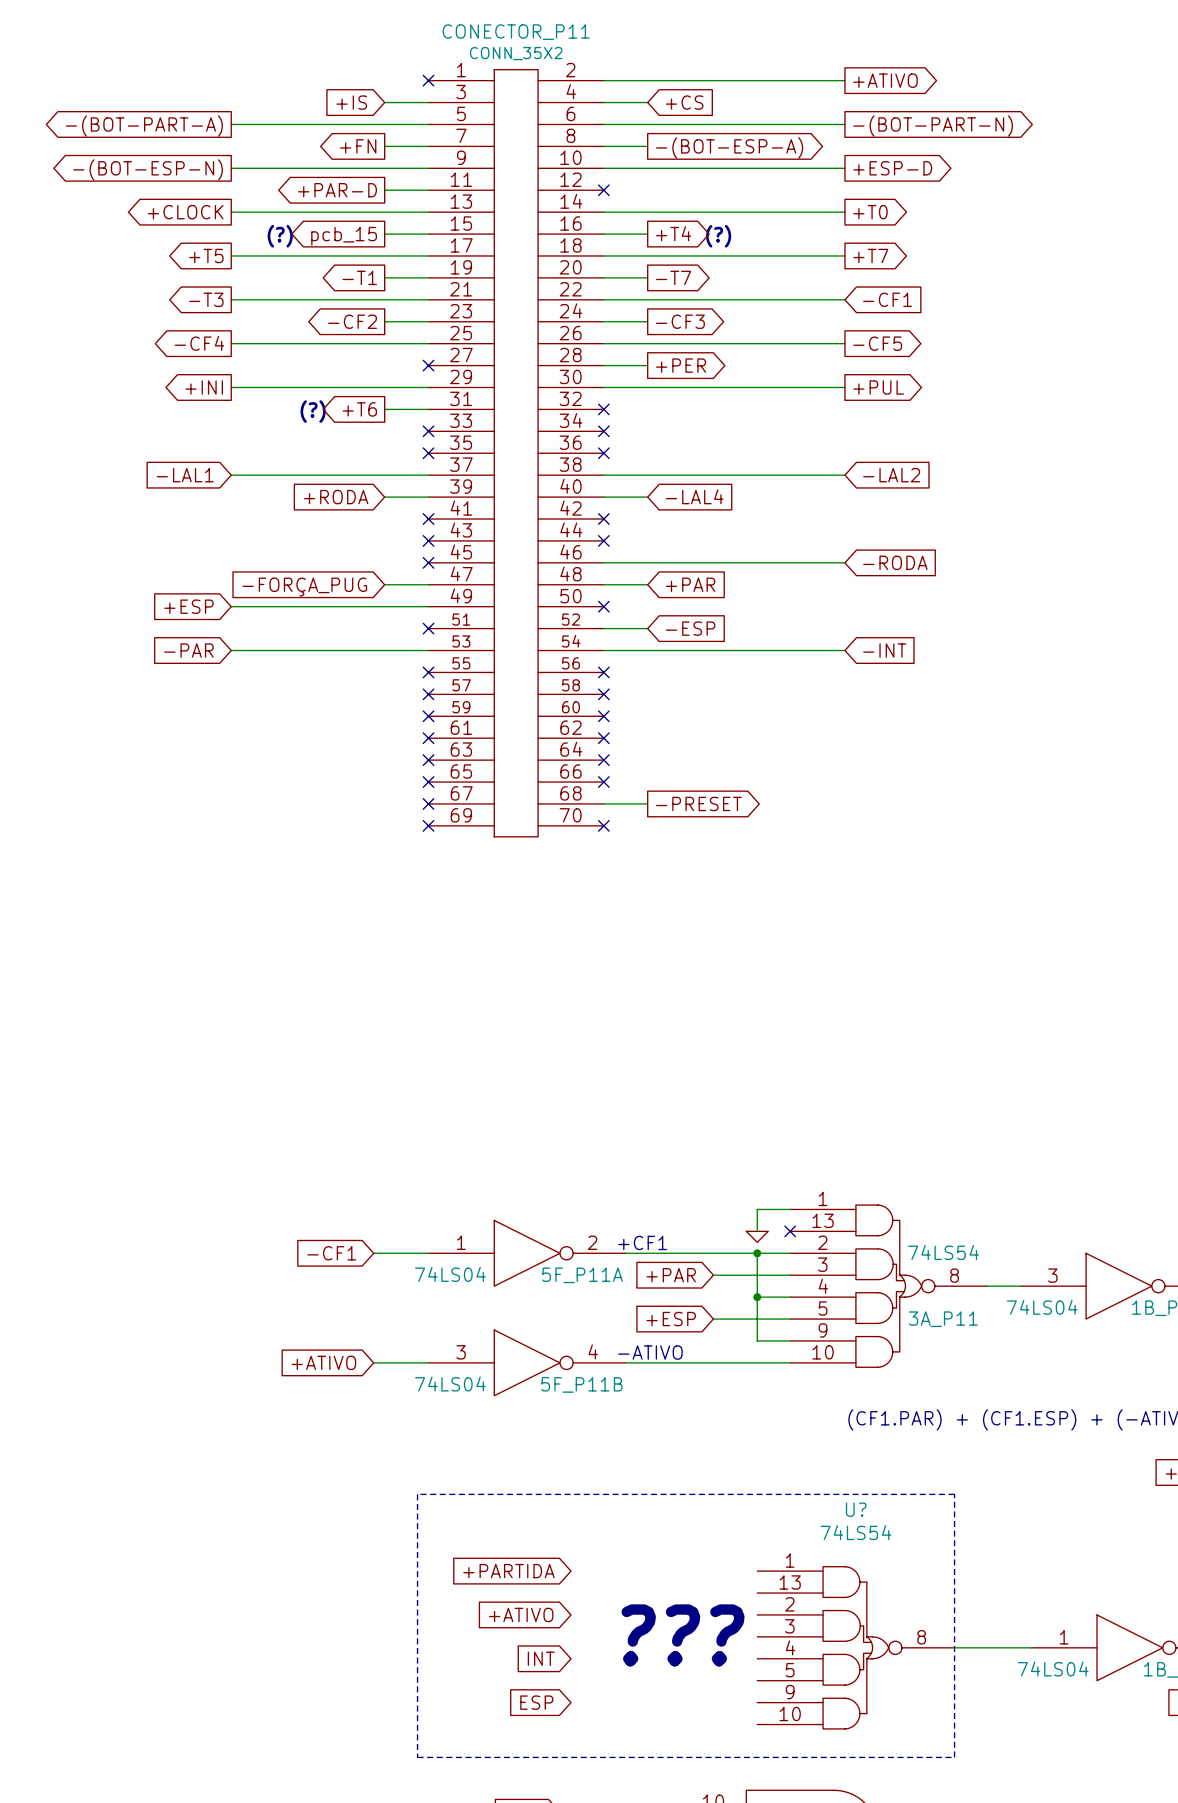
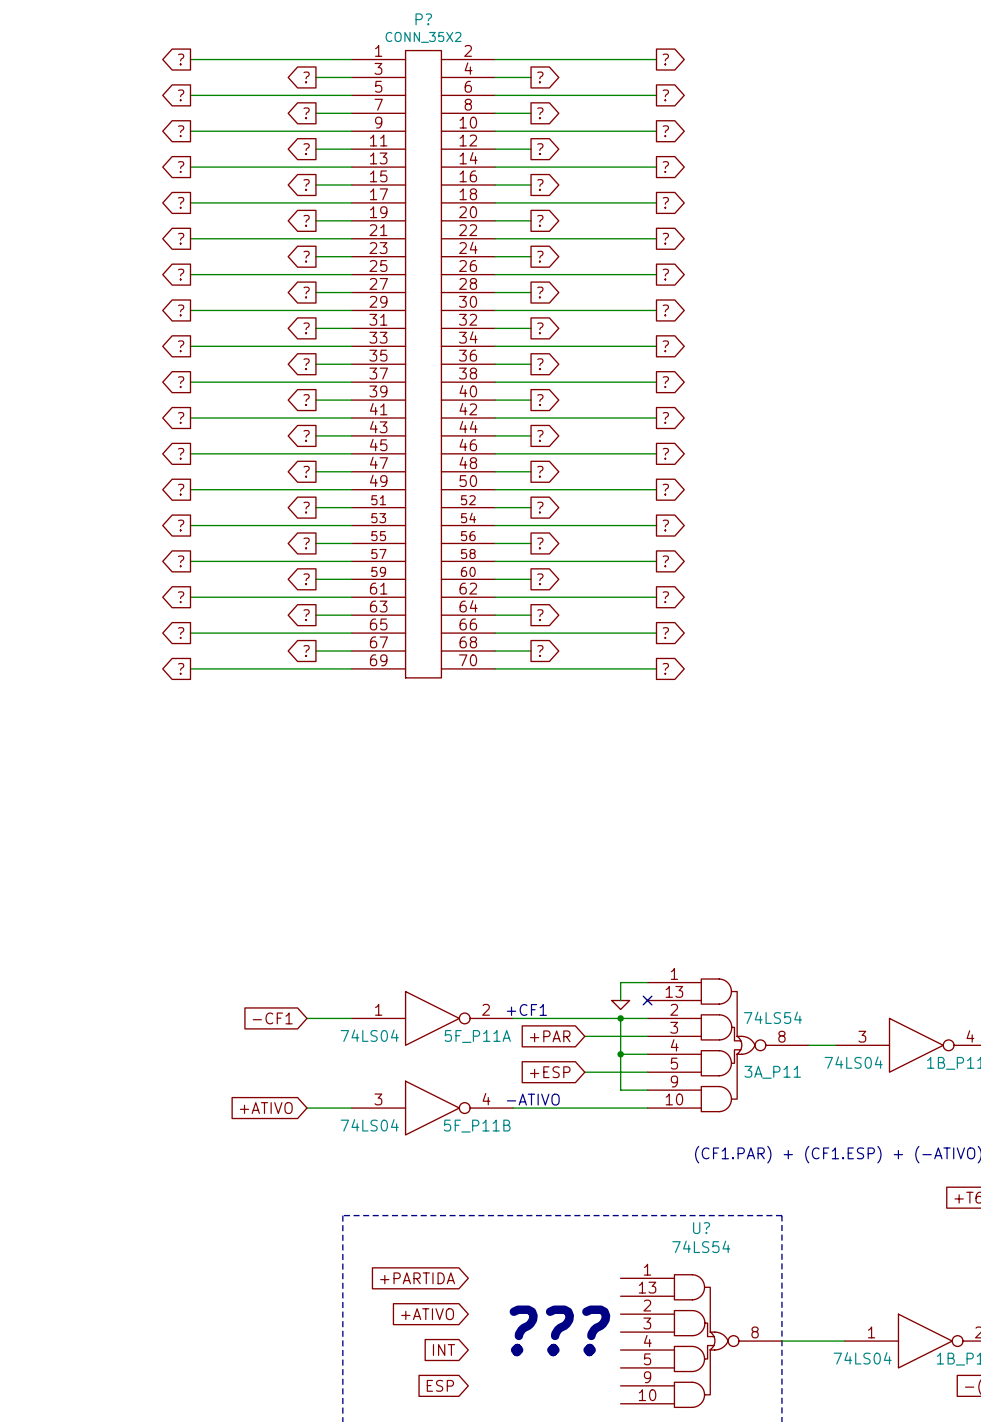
CONECTOR_P11 name: CONECTOR_P11 (516, 32) -> P? (423, 19)
global label: none -> ? (181, 59)
wire: none -> (190, 59) (351, 59)
no-connect mark: (428, 80) -> none
wire: (801, 80) (844, 80) -> none
global label: none -> ? (665, 59)
global label: +ATIVO (885, 80) -> none
global label shape: input (351, 102) -> output (306, 77)
global label: +IS (351, 102) -> ? (306, 77)
global label shape: input (684, 102) -> output (540, 77)
global label: +CS (684, 102) -> ? (540, 77)
wire: (801, 124) (844, 124) -> (495, 149) (531, 149)
global label: none -> ? (665, 95)
global label: -(BOT-PART-A) (144, 126) -> ? (181, 95)
global label: -(BOT-PART-N) (933, 126) -> none
global label: +FN (358, 146) -> ? (306, 113)
global label: -(BOT-ESP-A) (729, 147) -> ? (540, 113)
wire: (801, 168) (844, 168) -> none
global label: none -> ? (665, 131)
global label: +ESP-D (892, 168) -> none
global label: -(BOT-ESP-N) (148, 169) -> ? (181, 131)
global label: +PAR-D (337, 190) -> ? (306, 149)
no-connect mark: (603, 190) -> none
global label: none -> ? (540, 149)
global label: +CLOCK (185, 212) -> ? (181, 167)
wire: (801, 212) (844, 212) -> none
global label: none -> ? (665, 167)
global label: +T0 (870, 212) -> none
global label: +T4 (673, 233) -> ? (540, 185)
text: (?) (280, 236) -> none
global label: pcb_15 (344, 236) -> ? (306, 185)
text: (?) (718, 236) -> none
global label: +T5 (206, 255) -> ? (181, 202)
wire: (801, 255) (844, 255) -> none
global label: none -> ? (665, 202)
global label: +T7 (870, 255) -> none
global label: -T1 (359, 277) -> ? (306, 220)
global label: -T7 (673, 277) -> ? (540, 220)
global label: -T3 (206, 299) -> ? (181, 238)
wire: (801, 299) (844, 299) -> none
global label: none -> ? (665, 238)
global label: -CF1 (887, 299) -> none
global label: -CF2 (352, 321) -> ? (306, 256)
global label: -CF3 (680, 321) -> ? (540, 256)
global label: -CF4 (199, 343) -> ? (181, 274)
wire: (801, 343) (844, 343) -> (495, 328) (531, 328)
global label: none -> ? (665, 274)
global label: -CF5 (877, 343) -> none
global label: none -> ? (306, 292)
wire: none -> (315, 292) (351, 292)
no-connect mark: (428, 365) -> none
global label: +PER (681, 365) -> ? (540, 292)
global label: +INI (204, 387) -> ? (181, 310)
wire: (801, 387) (844, 387) -> (495, 364) (531, 364)
global label: none -> ? (665, 310)
global label: +PUL (878, 387) -> none
global label: +T6 (359, 409) -> ? (306, 328)
no-connect mark: (603, 409) -> none
global label: none -> ? (540, 328)
text: (?) (313, 411) -> none
global label: none -> ? (181, 346)
wire: none -> (190, 346) (351, 346)
no-connect mark: (428, 431) -> none
wire: none -> (495, 346) (656, 346)
no-connect mark: (603, 431) -> none
global label: none -> ? (665, 346)
global label: none -> ? (306, 364)
wire: none -> (315, 364) (351, 364)
no-connect mark: (428, 453) -> none
no-connect mark: (603, 453) -> none
global label: none -> ? (540, 364)
global label shape: input (185, 475) -> output (181, 382)
global label: -LAL1 (185, 475) -> ? (181, 382)
wire: (801, 475) (844, 475) -> (495, 435) (531, 435)
global label: none -> ? (665, 382)
global label: -LAL2 (891, 475) -> none
global label shape: input (694, 496) -> output (540, 400)
global label: -LAL4 (694, 496) -> ? (540, 400)
global label shape: input (336, 497) -> output (306, 400)
global label: +RODA (336, 497) -> ? (306, 400)
global label: none -> ? (181, 418)
wire: none -> (190, 418) (351, 418)
no-connect mark: (428, 519) -> none
wire: none -> (495, 418) (656, 418)
no-connect mark: (603, 519) -> none
global label: none -> ? (665, 418)
global label: none -> ? (306, 435)
wire: none -> (315, 435) (351, 435)
no-connect mark: (428, 540) -> none
no-connect mark: (603, 540) -> none
global label: none -> ? (540, 435)
global label: none -> ? (181, 453)
wire: none -> (190, 453) (351, 453)
no-connect mark: (428, 562) -> none
wire: (801, 562) (844, 562) -> none
global label: none -> ? (665, 453)
global label: -RODA (895, 562) -> none
global label shape: input (690, 584) -> output (540, 471)
global label: +PAR (690, 584) -> ? (540, 471)
global label shape: input (304, 586) -> output (306, 471)
global label: -FORÇA_PUG (304, 586) -> ? (306, 471)
global label shape: input (188, 606) -> output (181, 489)
global label: +ESP (188, 606) -> ? (181, 489)
wire: none -> (495, 489) (656, 489)
no-connect mark: (603, 606) -> none
global label: none -> ? (665, 489)
global label: none -> ? (306, 507)
wire: none -> (315, 507) (351, 507)
no-connect mark: (428, 628) -> none
global label shape: input (690, 628) -> output (540, 507)
global label: -ESP (690, 628) -> ? (540, 507)
global label shape: input (188, 650) -> output (181, 525)
global label: -PAR (188, 650) -> ? (181, 525)
wire: (801, 650) (844, 650) -> (495, 579) (531, 579)
global label: none -> ? (665, 525)
global label: -INT (884, 650) -> none
global label: none -> ? (306, 543)
wire: none -> (315, 543) (351, 543)
no-connect mark: (428, 672) -> none
wire: none -> (495, 543) (531, 543)
no-connect mark: (603, 672) -> none
global label: none -> ? (540, 543)
global label: none -> ? (181, 561)
wire: none -> (190, 561) (351, 561)
no-connect mark: (428, 694) -> none
wire: none -> (495, 561) (656, 561)
no-connect mark: (603, 694) -> none
global label: none -> ? (665, 561)
global label: none -> ? (306, 579)
wire: none -> (315, 579) (351, 579)
no-connect mark: (428, 716) -> none
no-connect mark: (603, 716) -> none
global label: none -> ? (540, 579)
global label: none -> ? (181, 597)
wire: none -> (190, 597) (351, 597)
no-connect mark: (428, 738) -> none
wire: none -> (495, 597) (656, 597)
no-connect mark: (603, 738) -> none
global label: none -> ? (665, 597)
global label: none -> ? (306, 615)
wire: none -> (315, 615) (351, 615)
no-connect mark: (428, 760) -> none
wire: none -> (495, 615) (531, 615)
no-connect mark: (603, 760) -> none
global label: none -> ? (540, 615)
global label: none -> ? (181, 633)
wire: none -> (190, 633) (351, 633)
no-connect mark: (428, 782) -> none
wire: none -> (495, 633) (656, 633)
no-connect mark: (603, 782) -> none
global label: none -> ? (665, 633)
global label: none -> ? (306, 651)
wire: none -> (315, 651) (351, 651)
no-connect mark: (428, 803) -> none
global label: -PRESET (698, 803) -> ? (540, 651)
global label: none -> ? (181, 668)
wire: none -> (190, 668) (351, 668)
no-connect mark: (428, 825) -> none
wire: none -> (495, 668) (656, 668)
no-connect mark: (603, 825) -> none
global label: none -> ? (665, 668)

